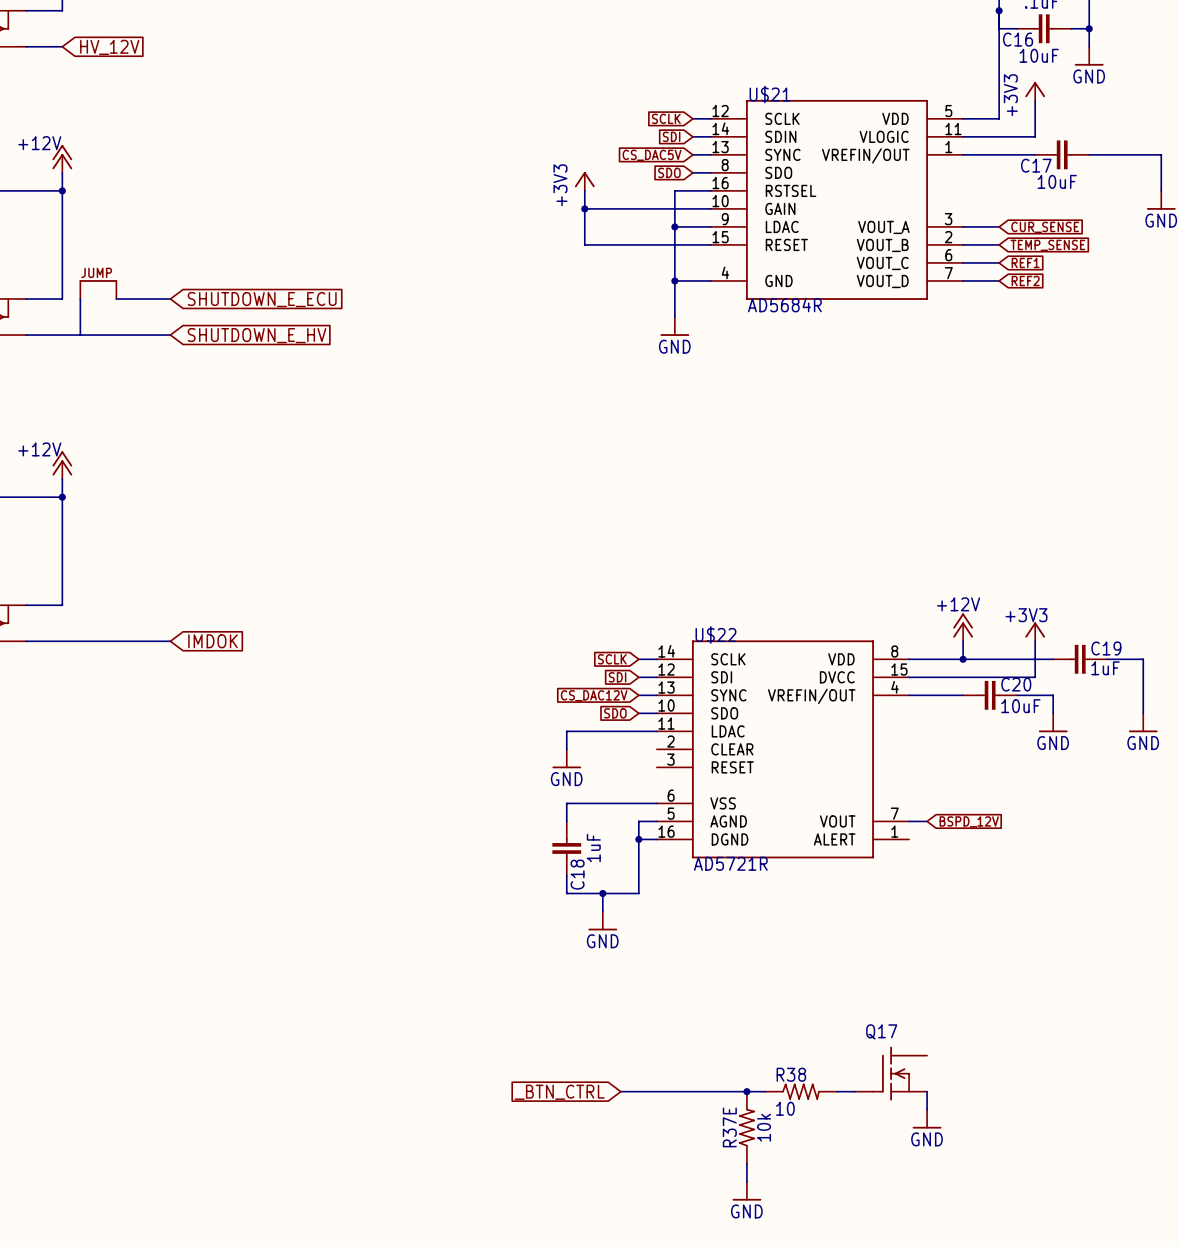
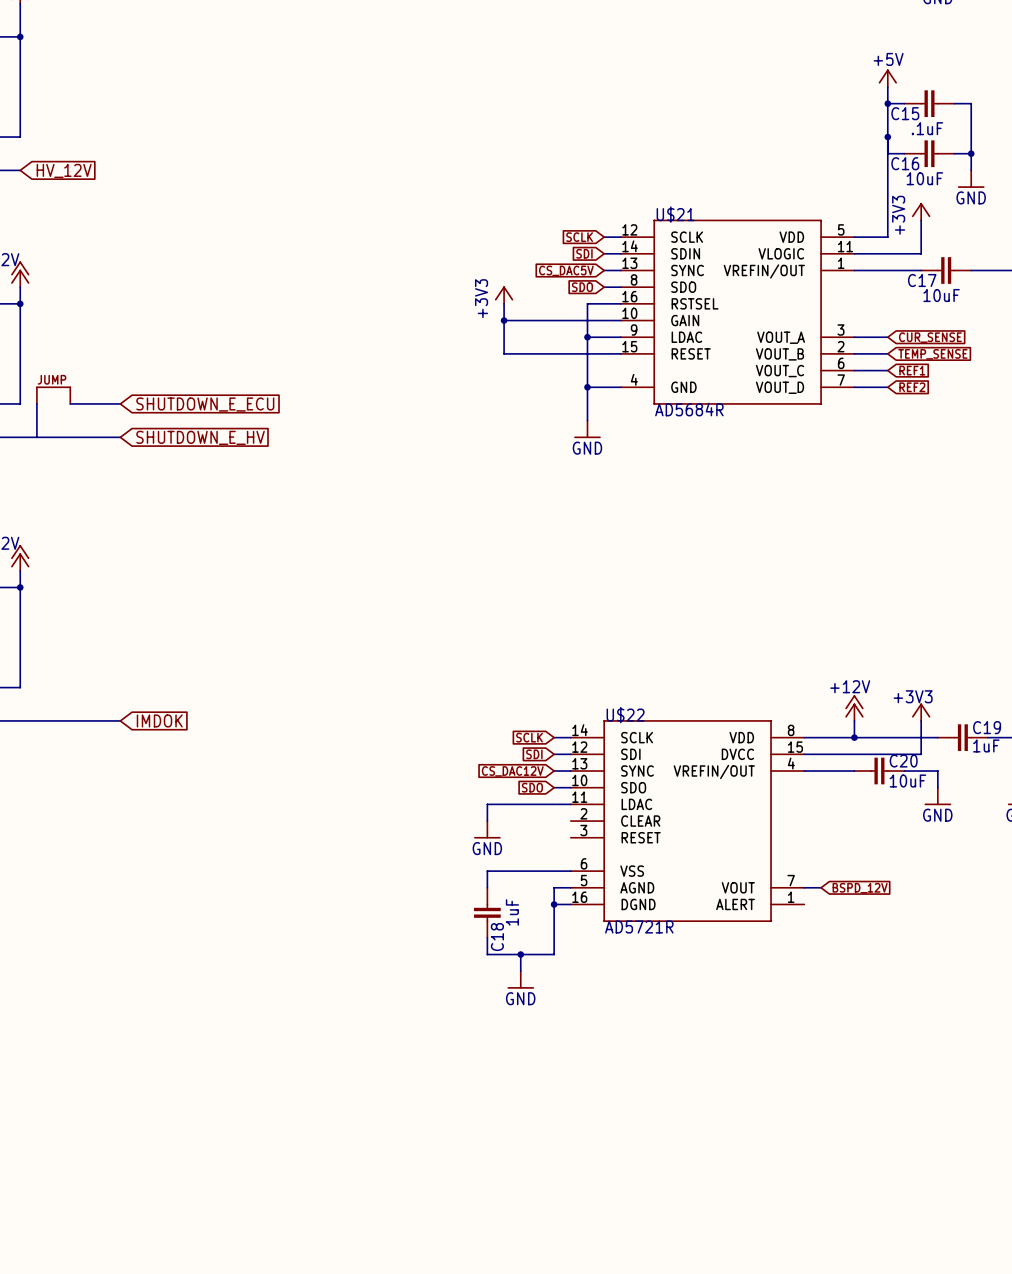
Q17: (891, 1073) -> none
wire: (620, 1091) (764, 1091) -> none
junction: (746, 1091) -> none
R38: 10 (800, 1091) -> none
wire: (837, 1091) (855, 1091) -> none
wire: (927, 1091) (927, 1109) -> none
global label: _BTN_CTRL (559, 1092) -> none
power symbol: GND (927, 1119) -> none
R37E: 10k (746, 1127) -> none
wire: (746, 1163) (746, 1181) -> none
power symbol: GND (746, 1191) -> none

